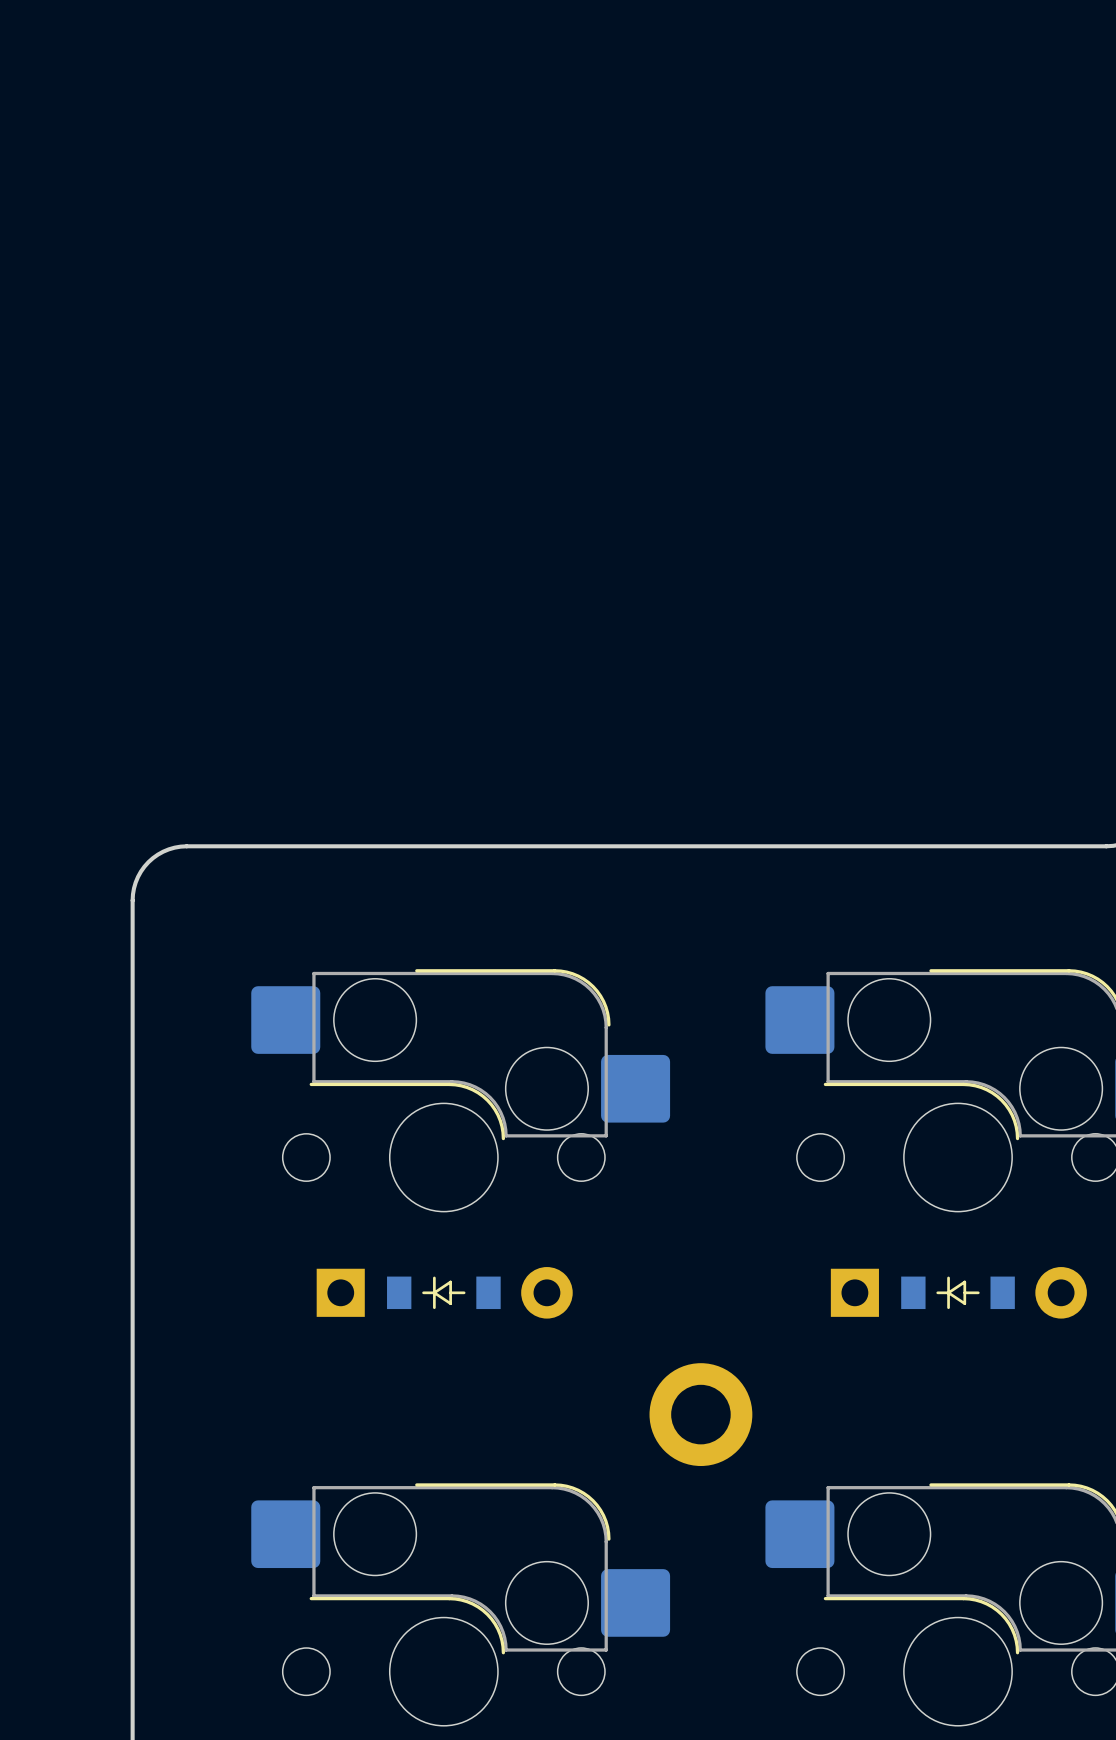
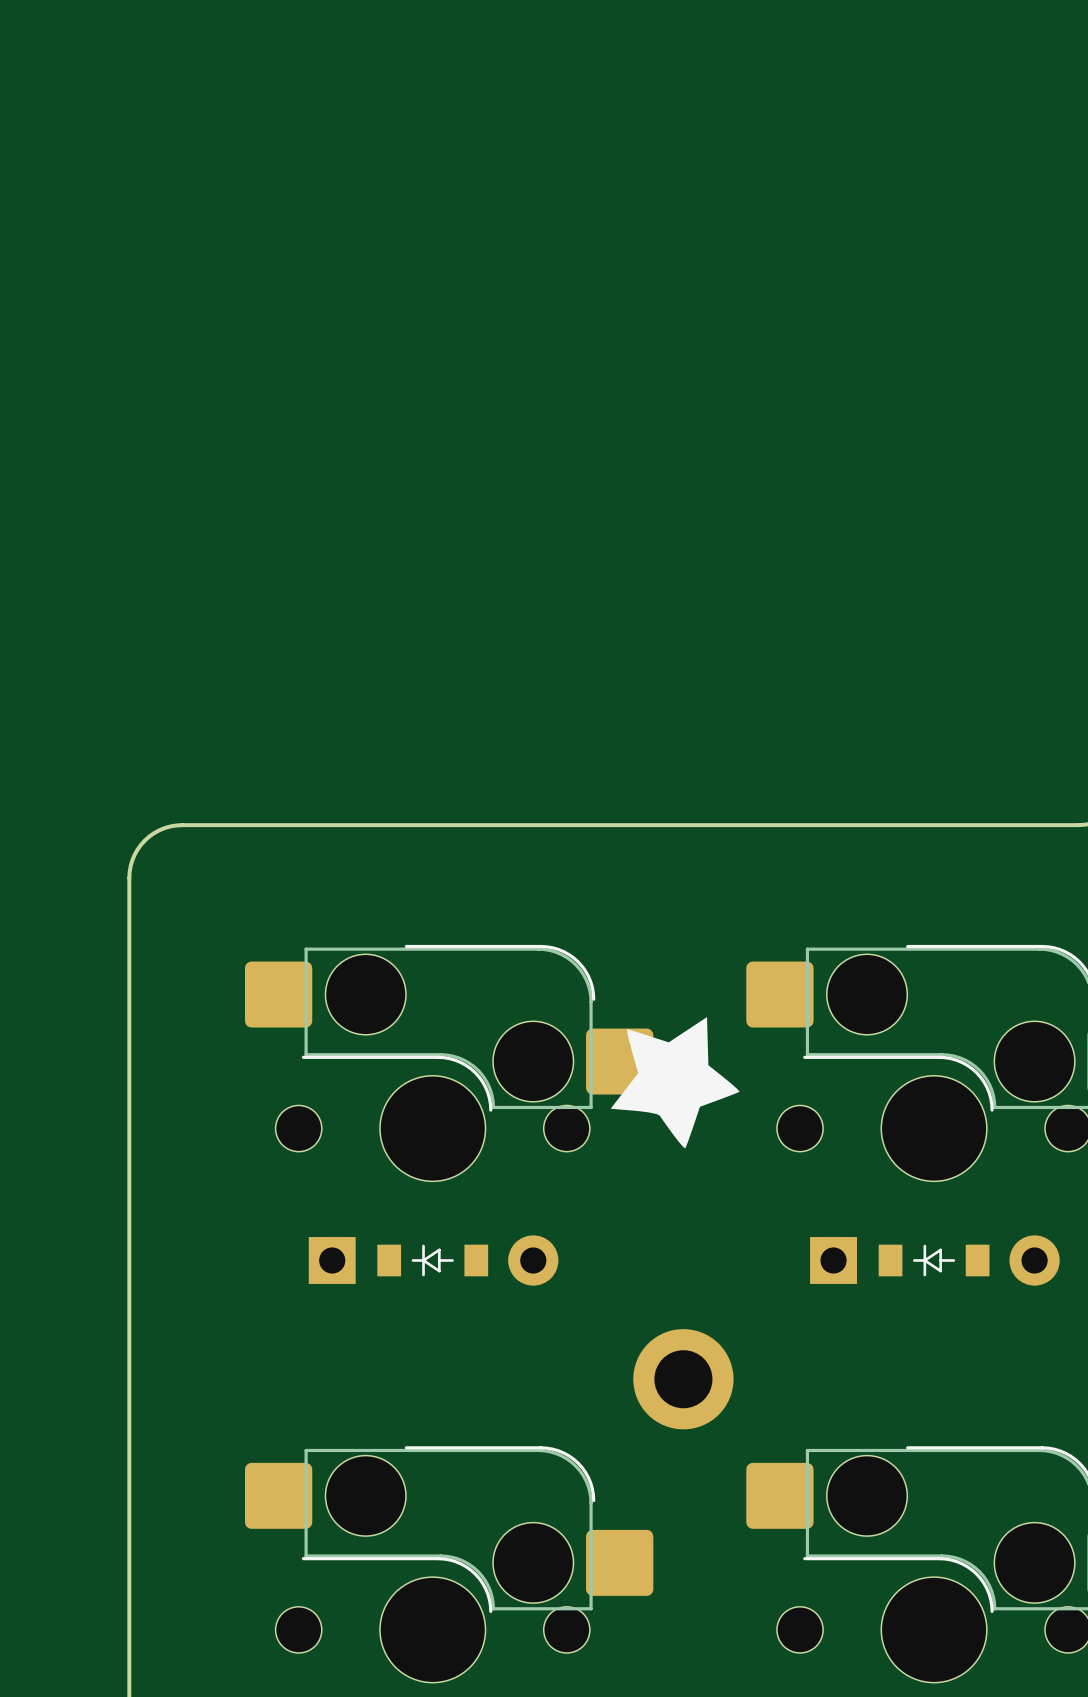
drawing: none -> [610, 1017, 740, 1149]

